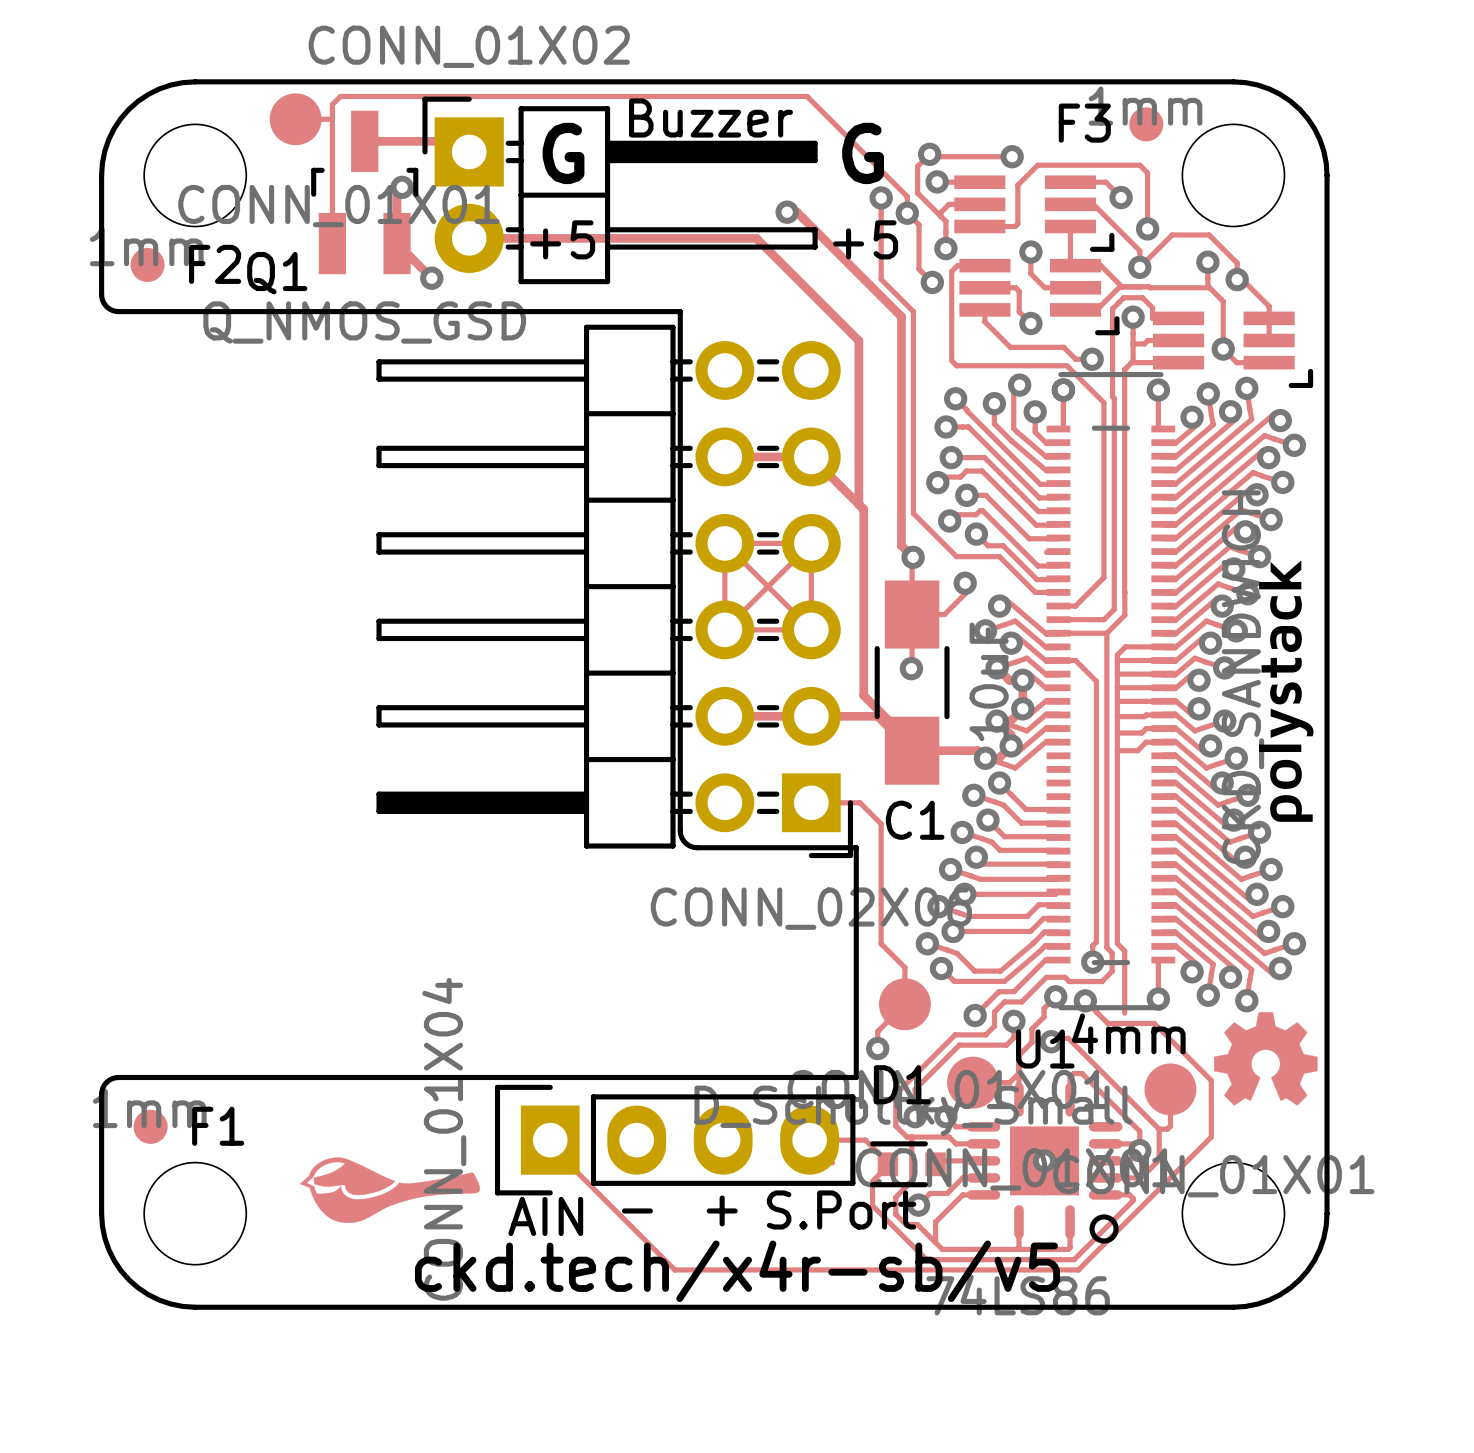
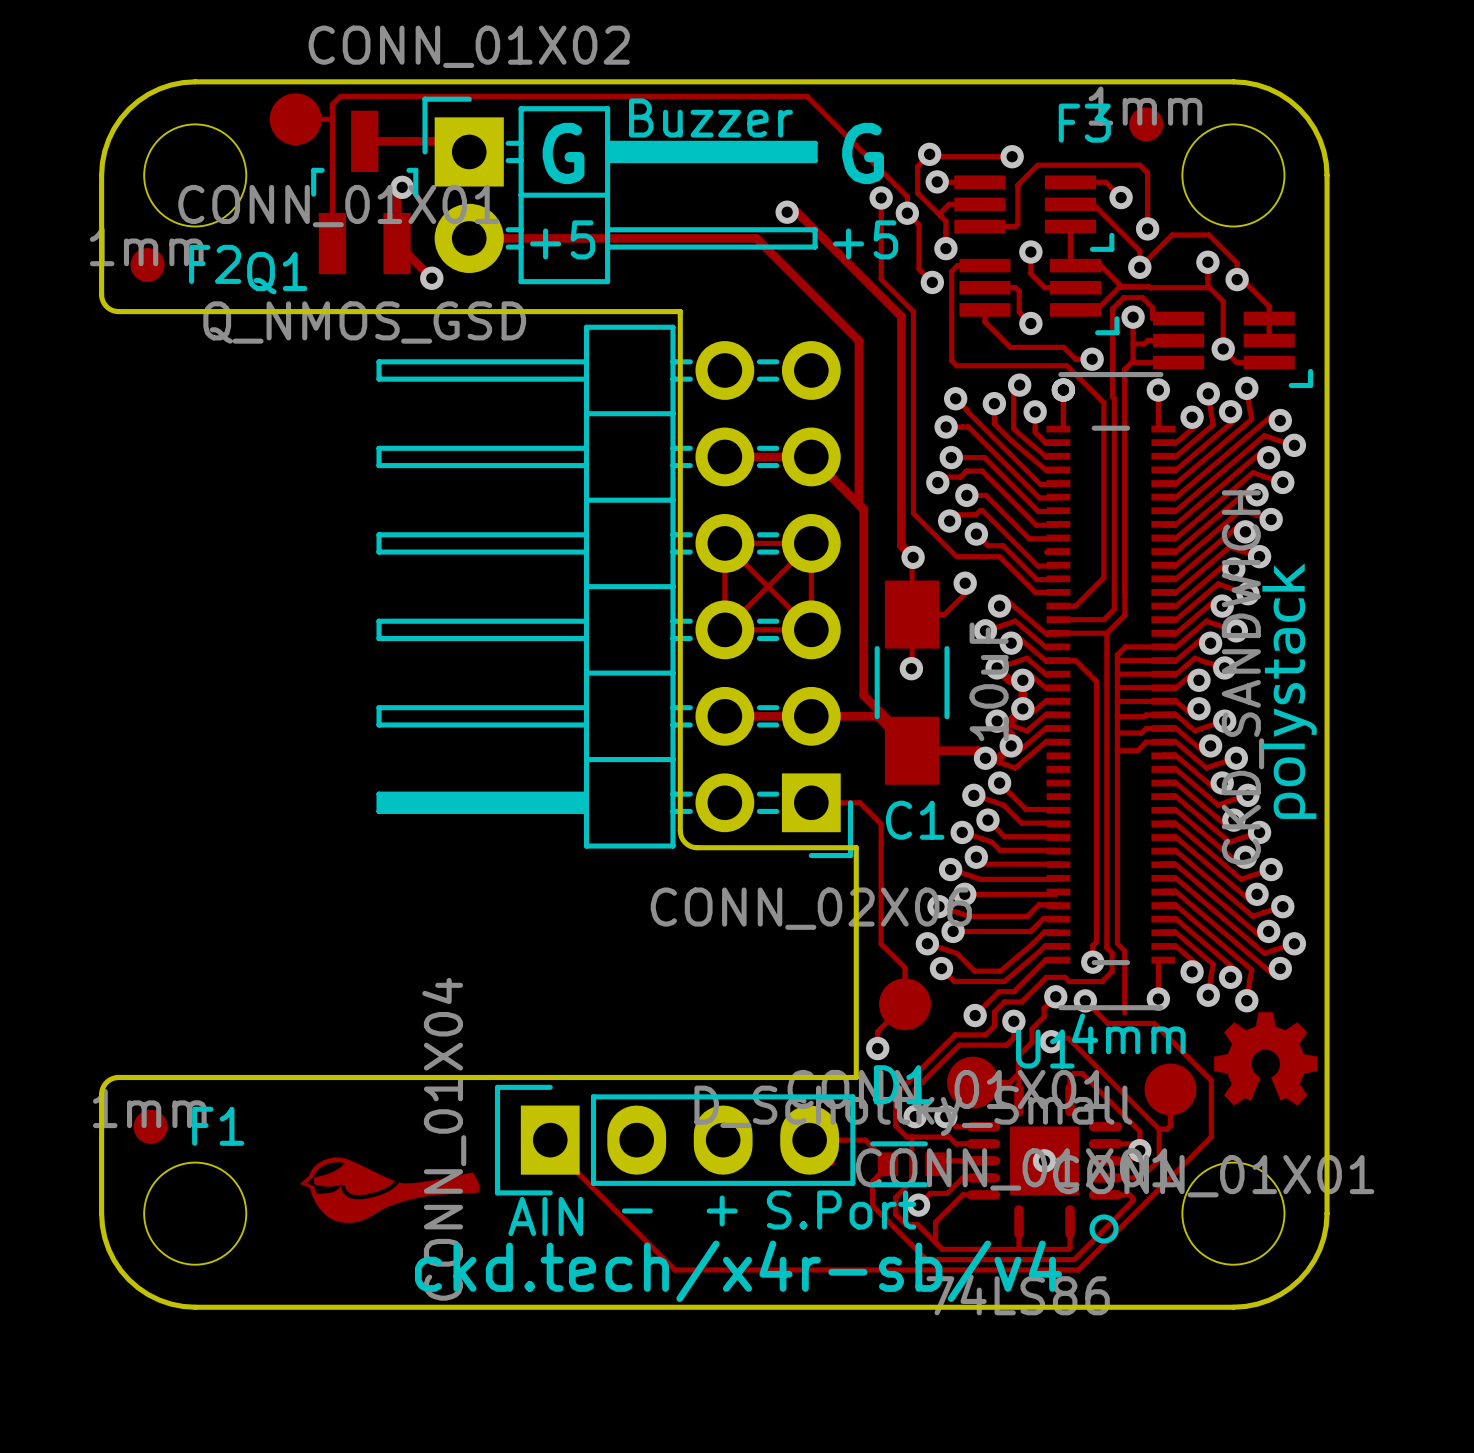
drawing shape: [1258, 560, 1314, 822] -> [1262, 563, 1317, 819]
text: ckd.tech/x4r-sb/v5 (737, 1271) -> ckd.tech/x4r-sb/v4 (738, 1271)

